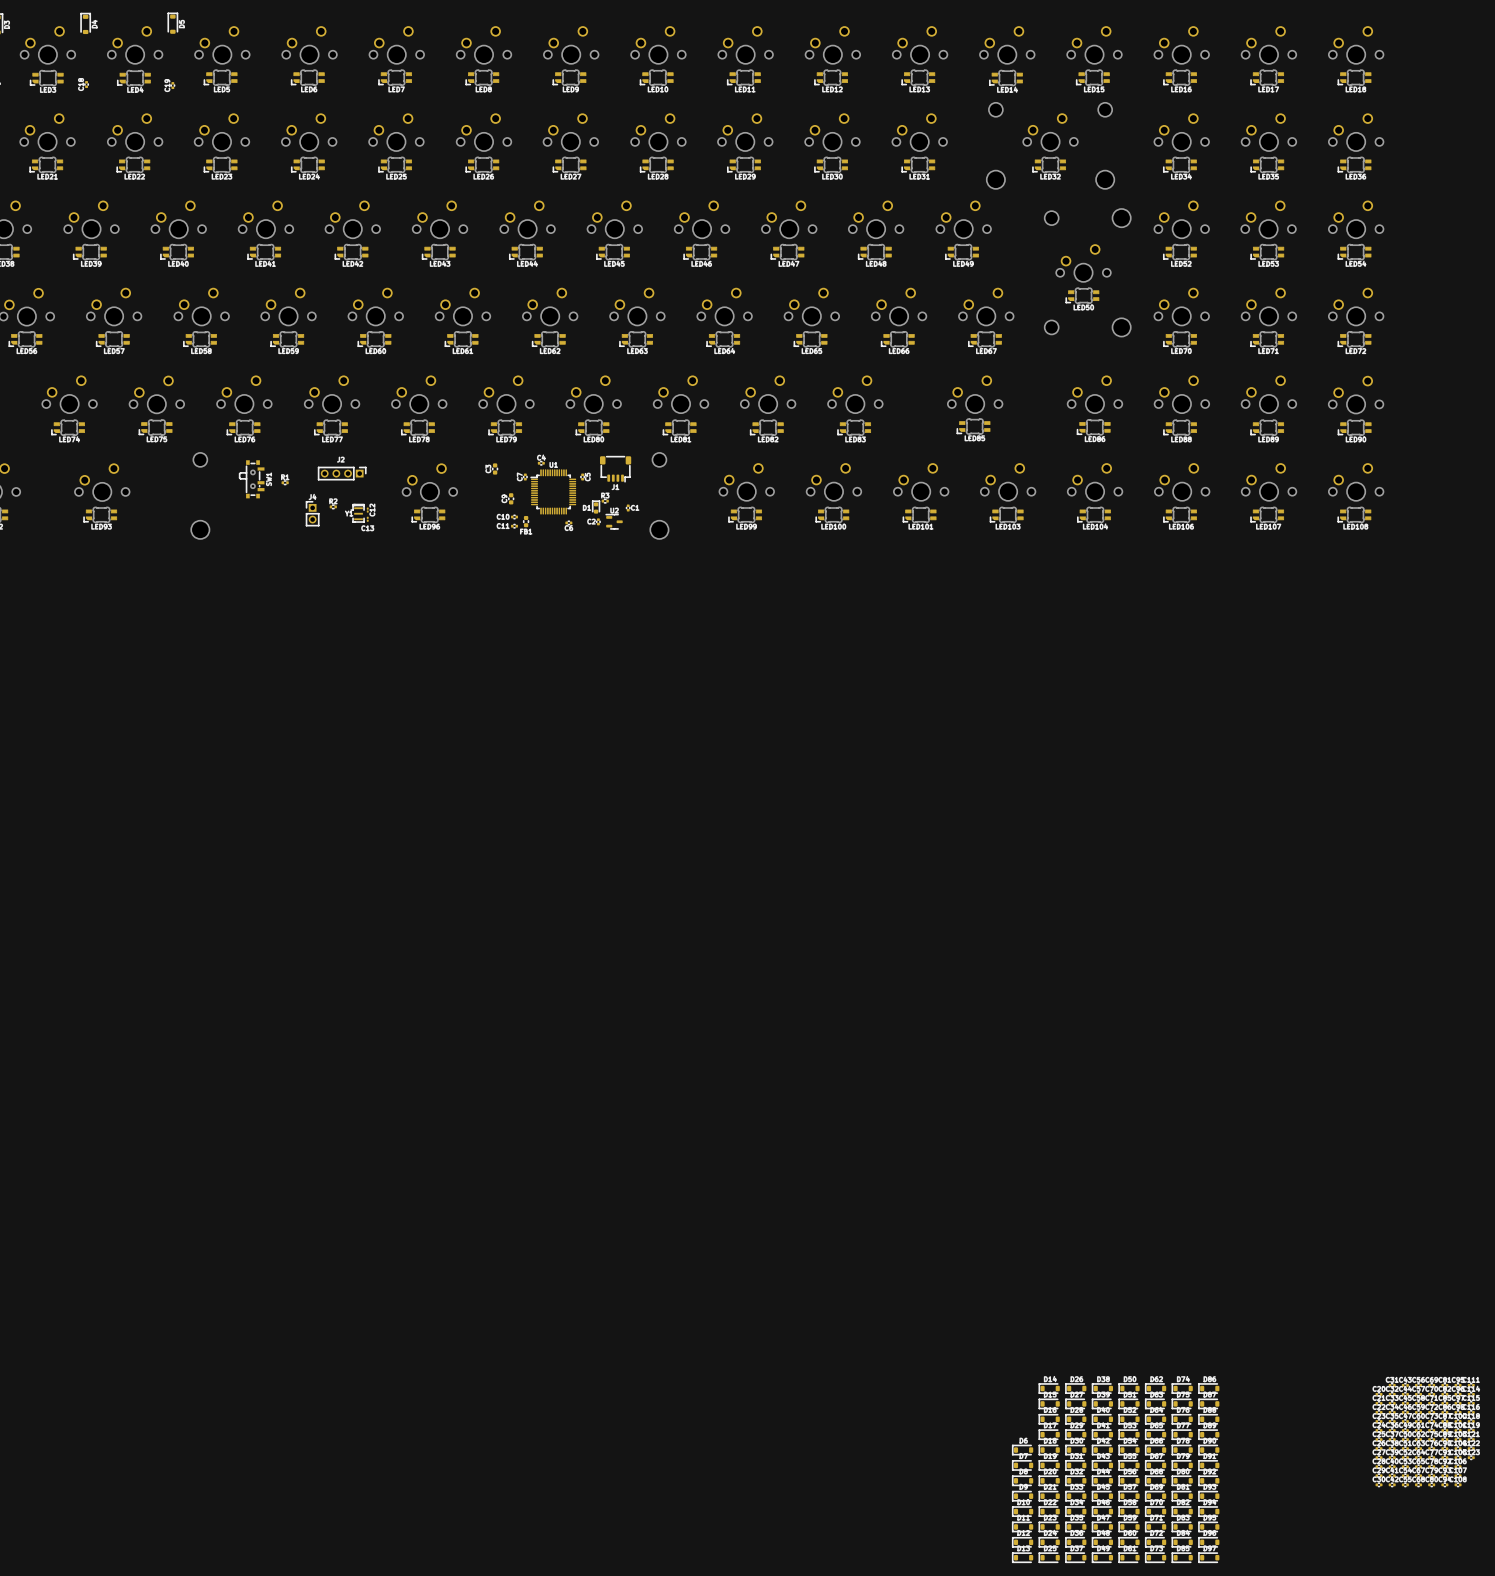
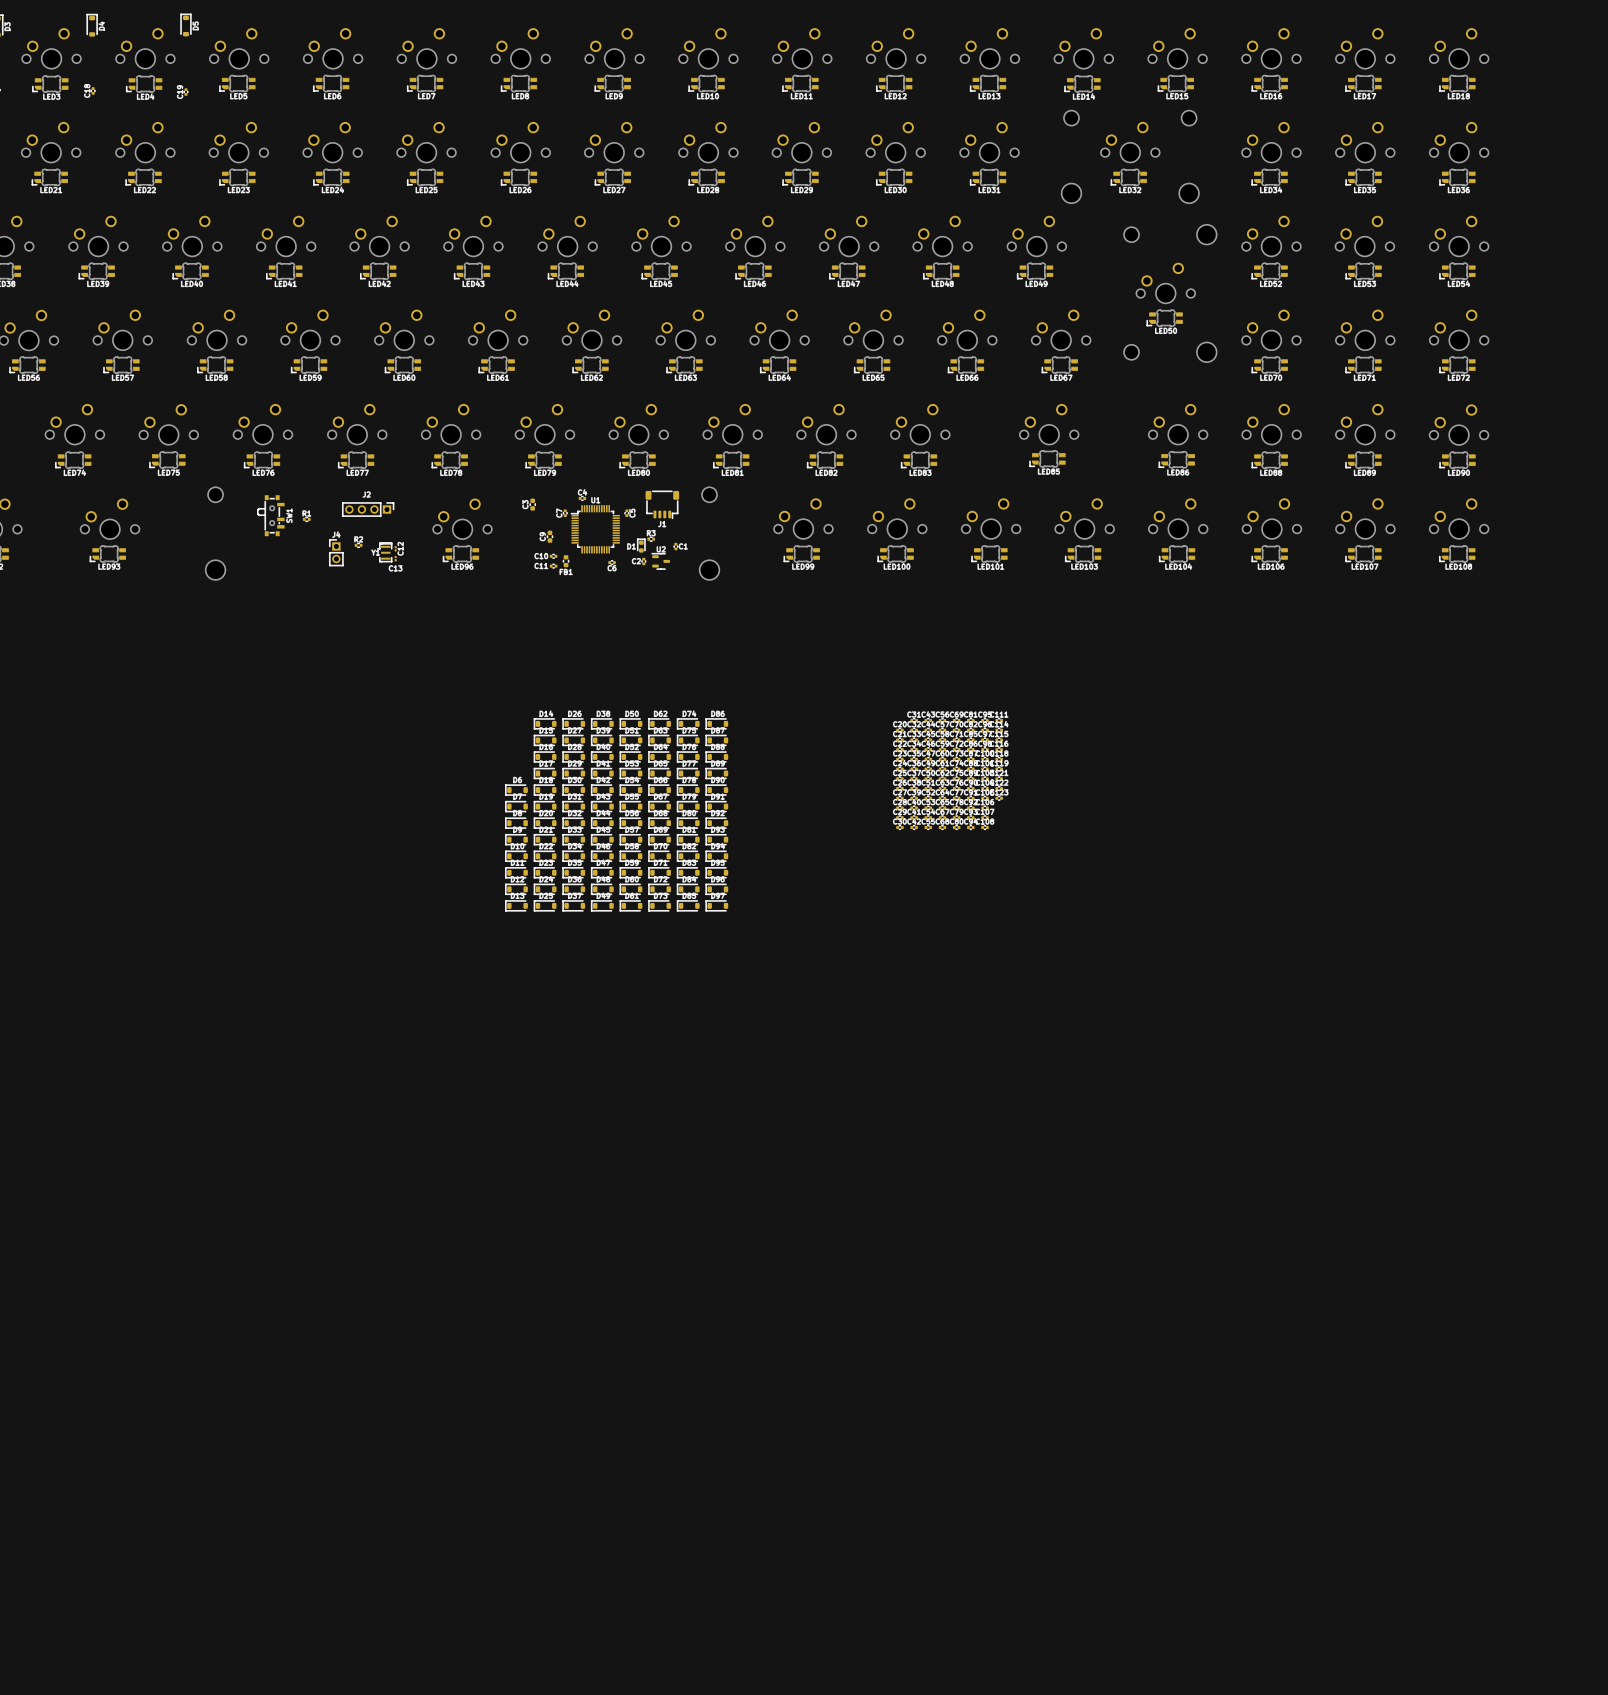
part position: (1392, 1385) -> (914, 720)
part position: (1405, 1385) -> (928, 720)
part position: (1418, 1385) -> (942, 720)
part position: (1431, 1385) -> (956, 720)
part position: (1444, 1385) -> (970, 720)
part position: (1458, 1385) -> (984, 720)
part position: (1471, 1385) -> (999, 720)
part position: (1049, 1388) -> (545, 723)
part position: (1076, 1388) -> (573, 723)
part position: (1102, 1388) -> (602, 723)
part position: (1129, 1388) -> (631, 723)
part position: (1155, 1388) -> (659, 723)
part position: (1182, 1388) -> (688, 723)
part position: (1209, 1388) -> (717, 723)
part position: (1379, 1394) -> (899, 730)
part position: (1392, 1394) -> (914, 730)
part position: (1405, 1394) -> (928, 730)
part position: (1418, 1394) -> (942, 730)
part position: (1431, 1394) -> (956, 730)
part position: (1444, 1394) -> (970, 730)
part position: (1458, 1394) -> (984, 730)
part position: (1471, 1394) -> (999, 730)
part position: (1049, 1403) -> (545, 740)
part position: (1076, 1403) -> (573, 740)
part position: (1102, 1403) -> (602, 740)
part position: (1129, 1403) -> (631, 740)
part position: (1155, 1403) -> (659, 740)
part position: (1182, 1403) -> (688, 740)
part position: (1209, 1403) -> (717, 740)
part position: (1379, 1403) -> (899, 739)
part position: (1392, 1403) -> (914, 739)
part position: (1405, 1403) -> (928, 739)
part position: (1418, 1403) -> (942, 739)
part position: (1431, 1403) -> (956, 739)
part position: (1444, 1403) -> (970, 739)
part position: (1458, 1403) -> (984, 739)
part position: (1471, 1403) -> (999, 739)
part position: (1379, 1412) -> (899, 749)
part position: (1392, 1412) -> (914, 749)
part position: (1405, 1412) -> (928, 749)
part position: (1418, 1412) -> (942, 749)
part position: (1431, 1412) -> (956, 749)
part position: (1444, 1412) -> (970, 749)
part position: (1458, 1412) -> (984, 749)
part position: (1471, 1412) -> (999, 749)
part position: (1049, 1419) -> (545, 756)
part position: (1076, 1419) -> (573, 756)
part position: (1102, 1419) -> (602, 756)
part position: (1129, 1419) -> (631, 756)
part position: (1155, 1419) -> (659, 756)
part position: (1182, 1419) -> (688, 756)
part position: (1209, 1419) -> (717, 756)
part position: (1379, 1421) -> (899, 759)
part position: (1392, 1421) -> (914, 759)
part position: (1405, 1421) -> (928, 759)
part position: (1418, 1421) -> (942, 759)
part position: (1431, 1421) -> (956, 759)
part position: (1444, 1421) -> (970, 759)
part position: (1458, 1421) -> (984, 759)
part position: (1471, 1421) -> (999, 759)
part position: (1379, 1430) -> (899, 769)
part position: (1392, 1430) -> (914, 769)
part position: (1405, 1430) -> (928, 769)
part position: (1418, 1430) -> (942, 769)
part position: (1431, 1430) -> (956, 769)
part position: (1444, 1430) -> (970, 769)
part position: (1458, 1430) -> (984, 769)
part position: (1471, 1430) -> (999, 769)
part position: (1049, 1434) -> (545, 773)
part position: (1076, 1434) -> (573, 773)
part position: (1102, 1434) -> (602, 773)
part position: (1129, 1434) -> (631, 773)
part position: (1155, 1434) -> (659, 773)
part position: (1182, 1434) -> (688, 773)
part position: (1209, 1434) -> (717, 773)
part position: (1379, 1439) -> (899, 778)
part position: (1392, 1439) -> (914, 778)
part position: (1405, 1439) -> (928, 778)
part position: (1418, 1439) -> (942, 778)
part position: (1431, 1439) -> (956, 778)
part position: (1444, 1439) -> (970, 778)
part position: (1458, 1439) -> (984, 778)
part position: (1471, 1439) -> (999, 778)
part position: (1379, 1448) -> (899, 788)
part position: (1392, 1448) -> (914, 788)
part position: (1405, 1448) -> (928, 788)
part position: (1418, 1448) -> (942, 788)
part position: (1431, 1448) -> (956, 788)
part position: (1444, 1448) -> (970, 788)
part position: (1458, 1448) -> (984, 788)
part position: (1471, 1448) -> (999, 788)
part position: (1022, 1450) -> (516, 790)
part position: (1049, 1450) -> (545, 790)
part position: (1076, 1450) -> (573, 790)
part position: (1102, 1450) -> (602, 790)
part position: (1129, 1450) -> (631, 790)
part position: (1155, 1450) -> (659, 790)
part position: (1182, 1450) -> (688, 790)
part position: (1209, 1450) -> (717, 790)
part position: (1379, 1457) -> (899, 798)
part position: (1392, 1457) -> (914, 798)
part position: (1405, 1457) -> (928, 798)
part position: (1418, 1457) -> (942, 798)
part position: (1431, 1457) -> (956, 798)
part position: (1444, 1457) -> (970, 798)
part position: (1458, 1457) -> (984, 798)
part position: (1471, 1457) -> (999, 798)
part position: (1022, 1465) -> (516, 806)
part position: (1049, 1465) -> (545, 806)
part position: (1076, 1465) -> (573, 806)
part position: (1102, 1465) -> (602, 806)
part position: (1129, 1465) -> (631, 806)
part position: (1155, 1465) -> (659, 806)
part position: (1182, 1465) -> (688, 806)
part position: (1209, 1465) -> (717, 806)
part position: (1379, 1466) -> (899, 808)
part position: (1392, 1466) -> (914, 808)
part position: (1405, 1466) -> (928, 808)
part position: (1418, 1466) -> (942, 808)
part position: (1431, 1466) -> (956, 808)
part position: (1444, 1466) -> (970, 808)
part position: (1458, 1466) -> (984, 808)
part position: (1379, 1475) -> (899, 817)
part position: (1392, 1475) -> (914, 817)
part position: (1405, 1475) -> (928, 817)
part position: (1418, 1475) -> (942, 817)
part position: (1431, 1475) -> (956, 817)
part position: (1444, 1475) -> (970, 817)
part position: (1458, 1475) -> (984, 817)
part position: (1022, 1480) -> (516, 823)
part position: (1049, 1480) -> (545, 823)
part position: (1076, 1480) -> (573, 823)
part position: (1102, 1480) -> (602, 823)
part position: (1129, 1480) -> (631, 823)
part position: (1155, 1480) -> (659, 823)
part position: (1182, 1480) -> (688, 823)
part position: (1209, 1480) -> (717, 823)
part position: (1379, 1484) -> (899, 827)
part position: (1392, 1484) -> (914, 827)
part position: (1405, 1484) -> (928, 827)
part position: (1418, 1484) -> (942, 827)
part position: (1431, 1484) -> (956, 827)
part position: (1444, 1484) -> (970, 827)
part position: (1458, 1484) -> (984, 827)
part position: (1022, 1496) -> (516, 839)
part position: (1049, 1496) -> (545, 839)
part position: (1076, 1496) -> (573, 839)
part position: (1102, 1496) -> (602, 839)
part position: (1129, 1496) -> (631, 839)
part position: (1155, 1496) -> (659, 839)
part position: (1182, 1496) -> (688, 839)
part position: (1209, 1496) -> (717, 839)
part position: (1022, 1511) -> (516, 856)
part position: (1049, 1511) -> (545, 856)
part position: (1076, 1511) -> (573, 856)
part position: (1102, 1511) -> (602, 856)
part position: (1129, 1511) -> (631, 856)
part position: (1155, 1511) -> (659, 856)
part position: (1182, 1511) -> (688, 856)
part position: (1209, 1511) -> (717, 856)
part position: (1022, 1526) -> (516, 872)
part position: (1049, 1526) -> (545, 872)
part position: (1076, 1526) -> (573, 872)
part position: (1102, 1526) -> (602, 872)
part position: (1129, 1526) -> (631, 872)
part position: (1155, 1526) -> (659, 872)
part position: (1182, 1526) -> (688, 872)
part position: (1209, 1526) -> (717, 872)
part position: (1022, 1542) -> (516, 889)
part position: (1049, 1542) -> (545, 889)
part position: (1076, 1542) -> (573, 889)
part position: (1102, 1542) -> (602, 889)
part position: (1129, 1542) -> (631, 889)
part position: (1155, 1542) -> (659, 889)
part position: (1182, 1542) -> (688, 889)
part position: (1209, 1542) -> (717, 889)
part position: (1022, 1557) -> (516, 905)
part position: (1049, 1557) -> (545, 905)
part position: (1076, 1557) -> (573, 905)
part position: (1102, 1557) -> (602, 905)
part position: (1129, 1557) -> (631, 905)
part position: (1155, 1557) -> (659, 905)
part position: (1182, 1557) -> (688, 905)
part position: (1209, 1557) -> (717, 905)

